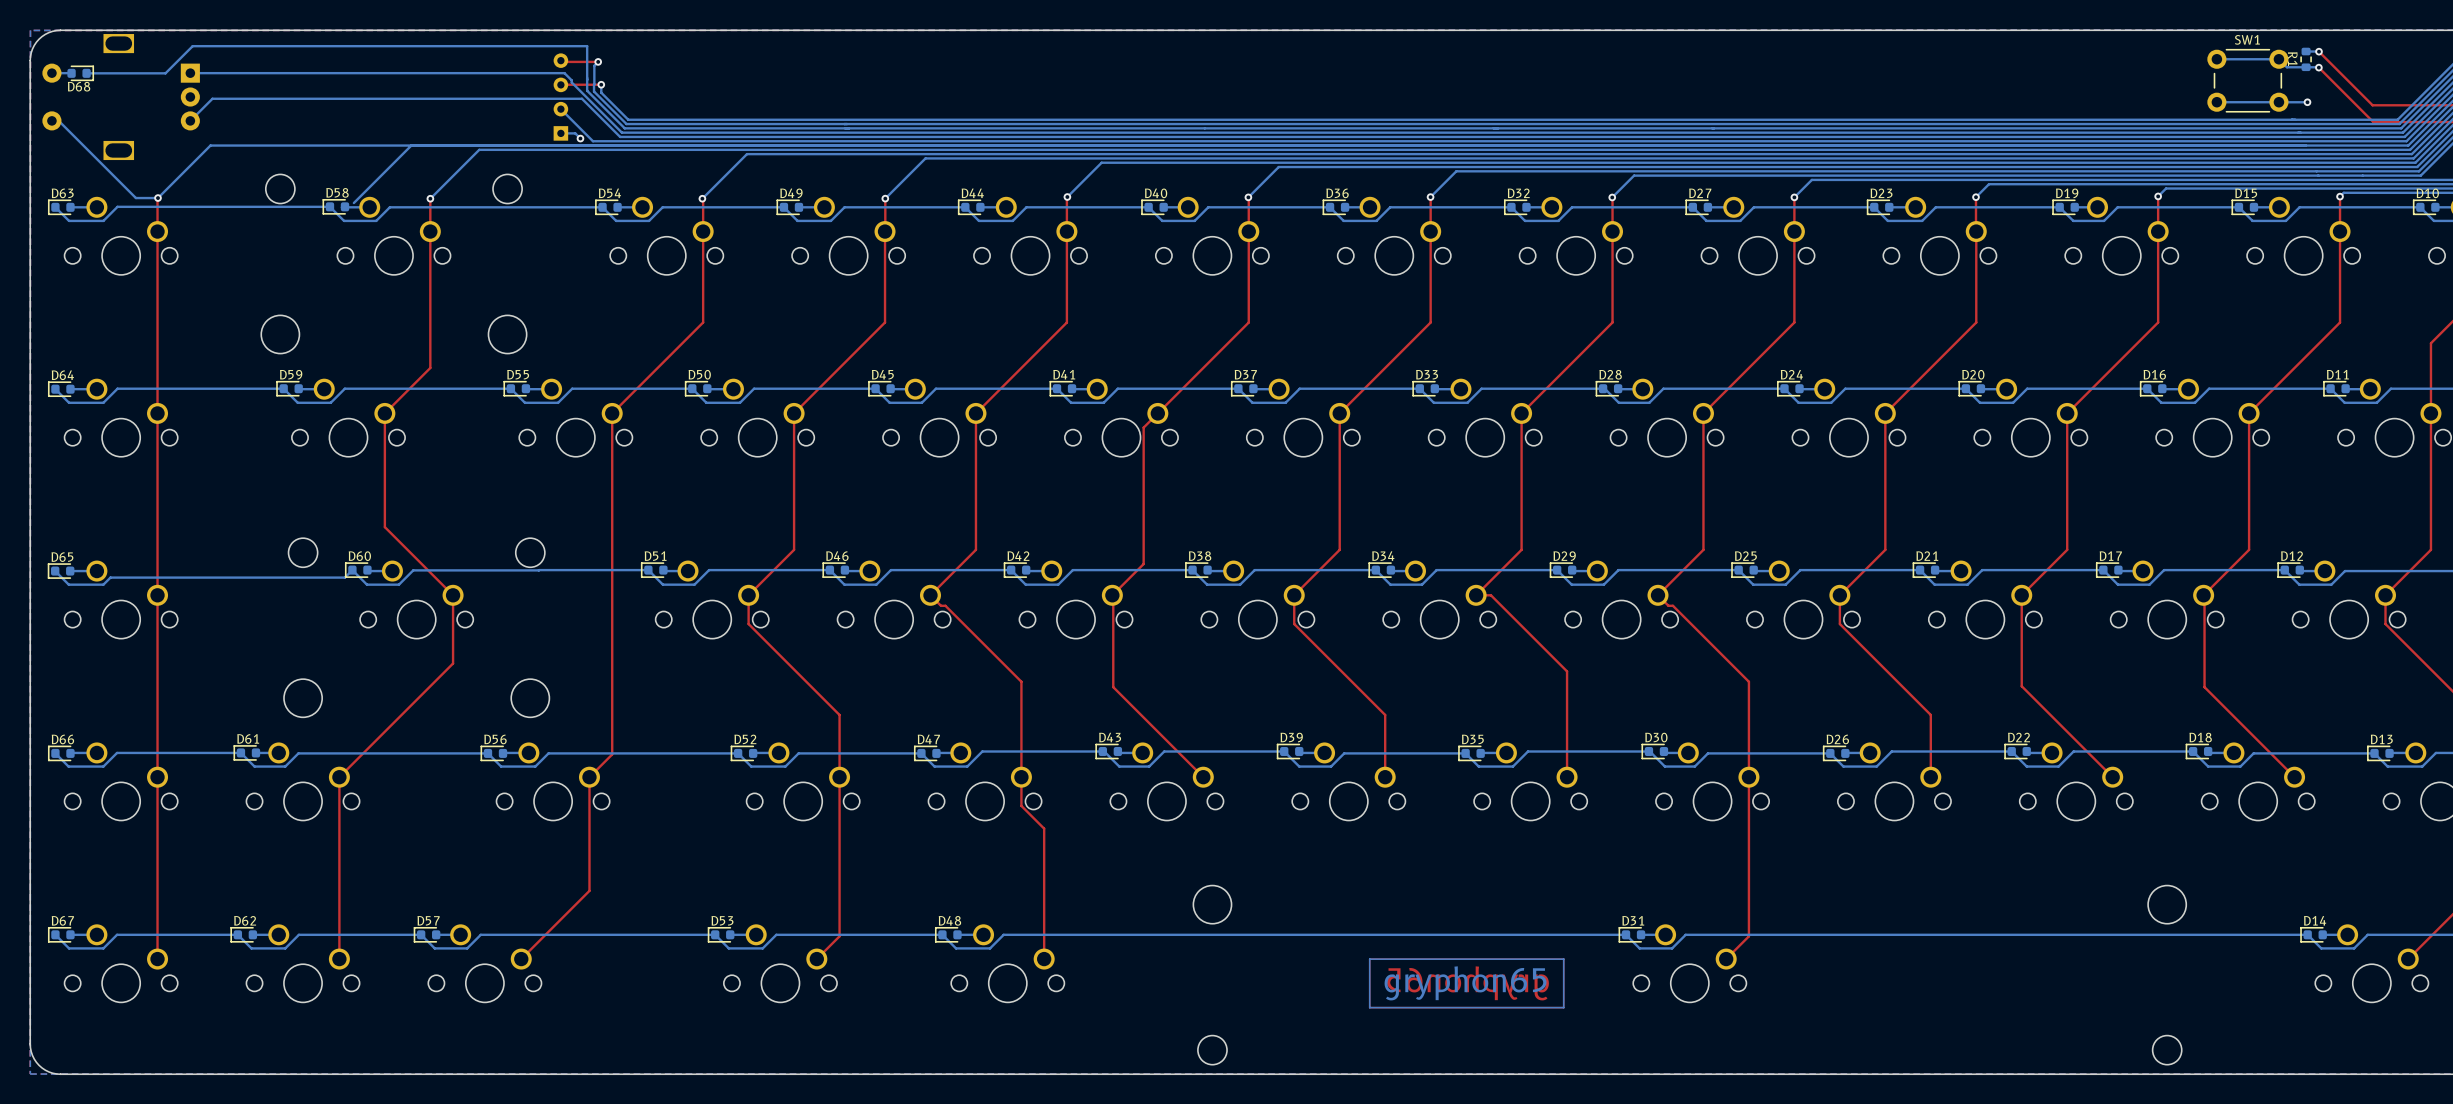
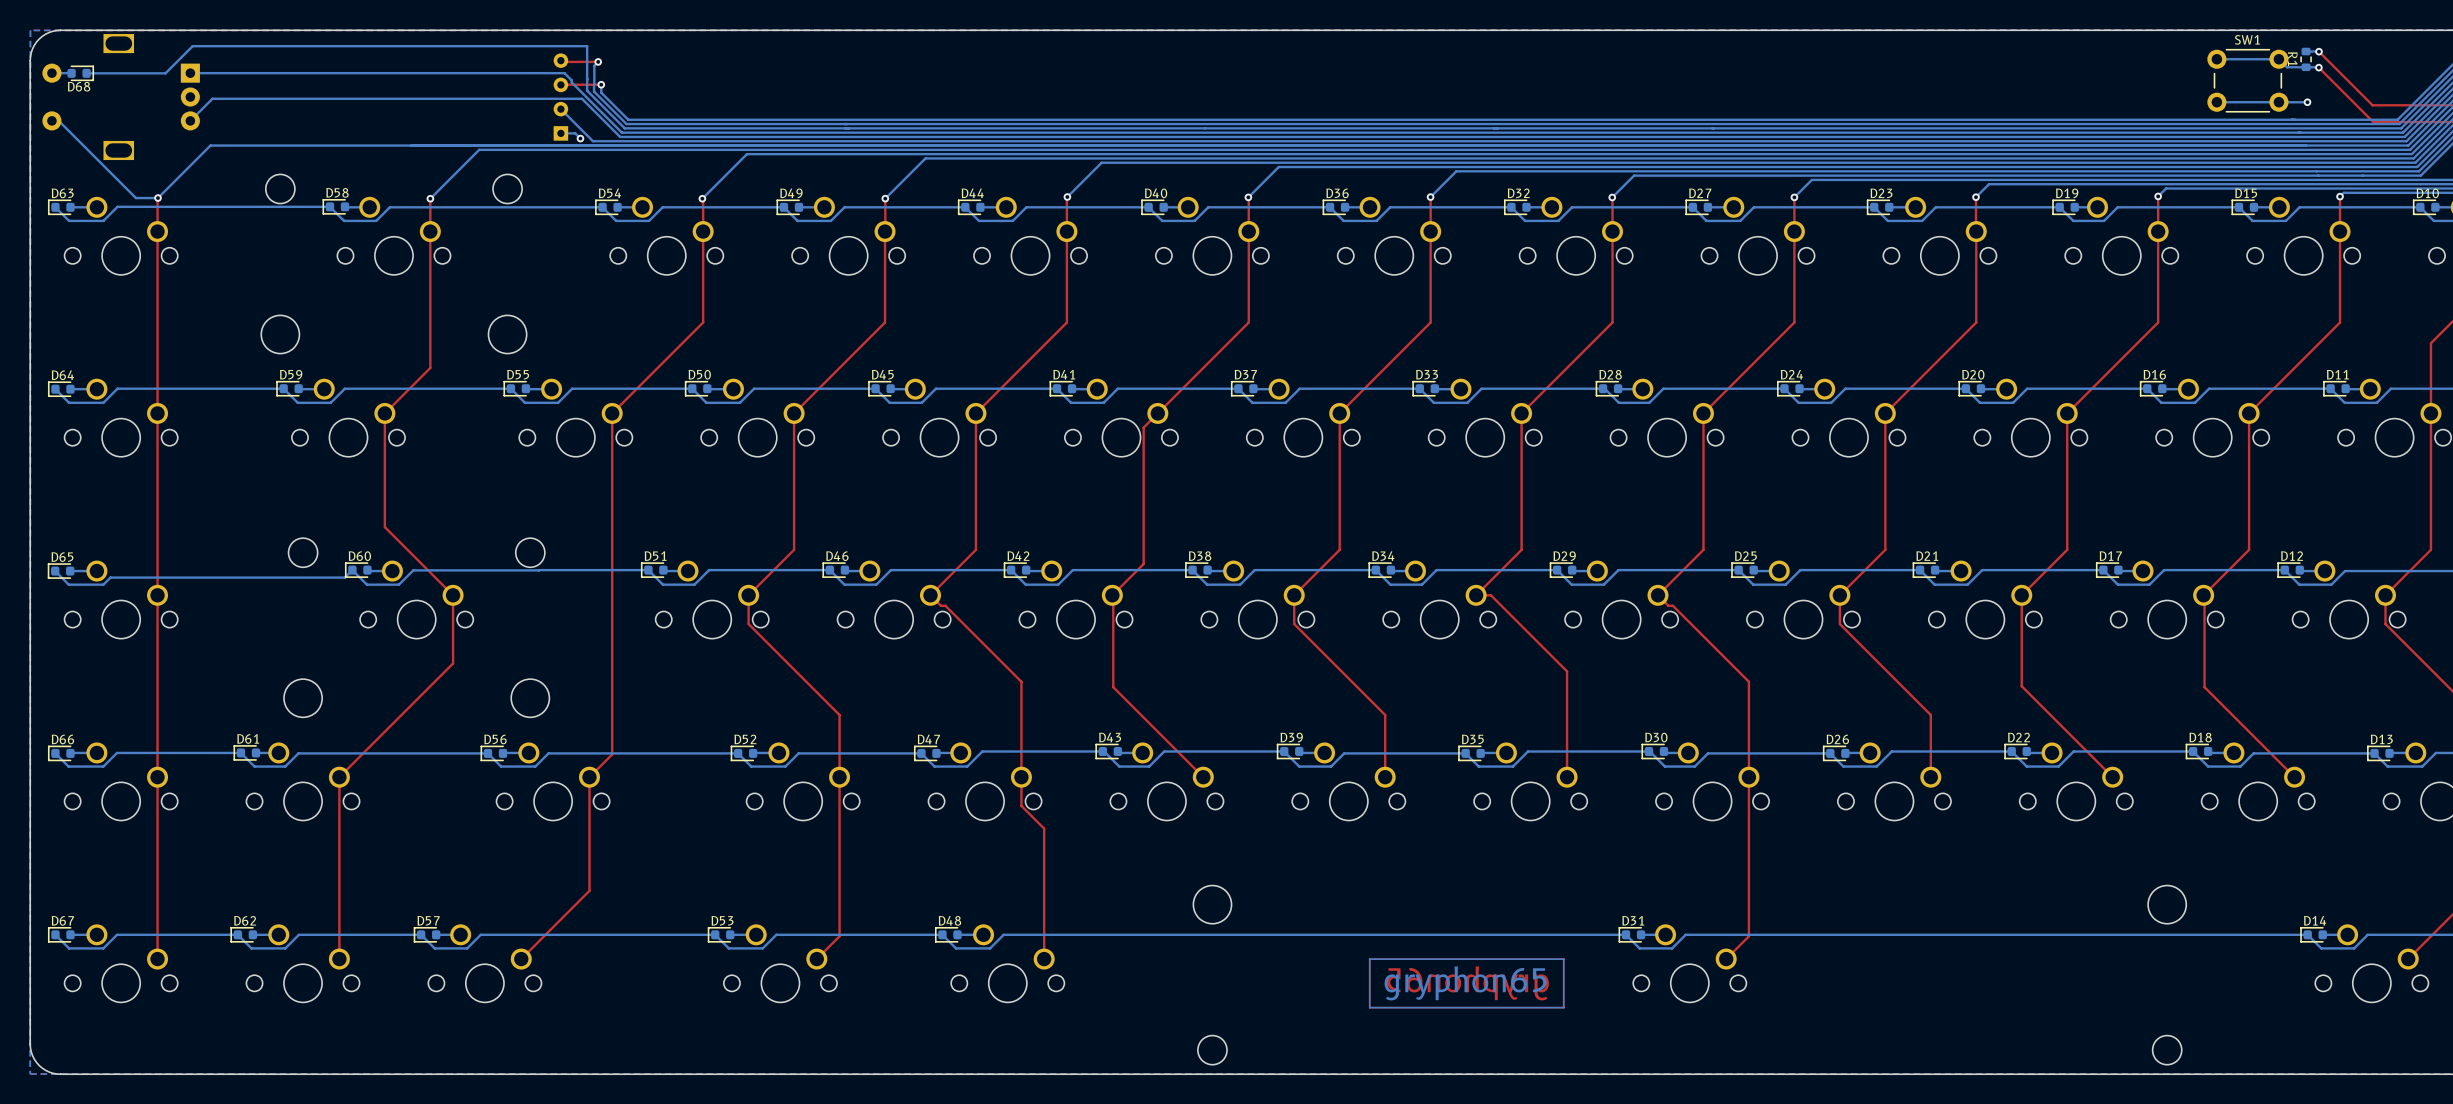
bottom track: (411, 145) (353, 203) -> none

